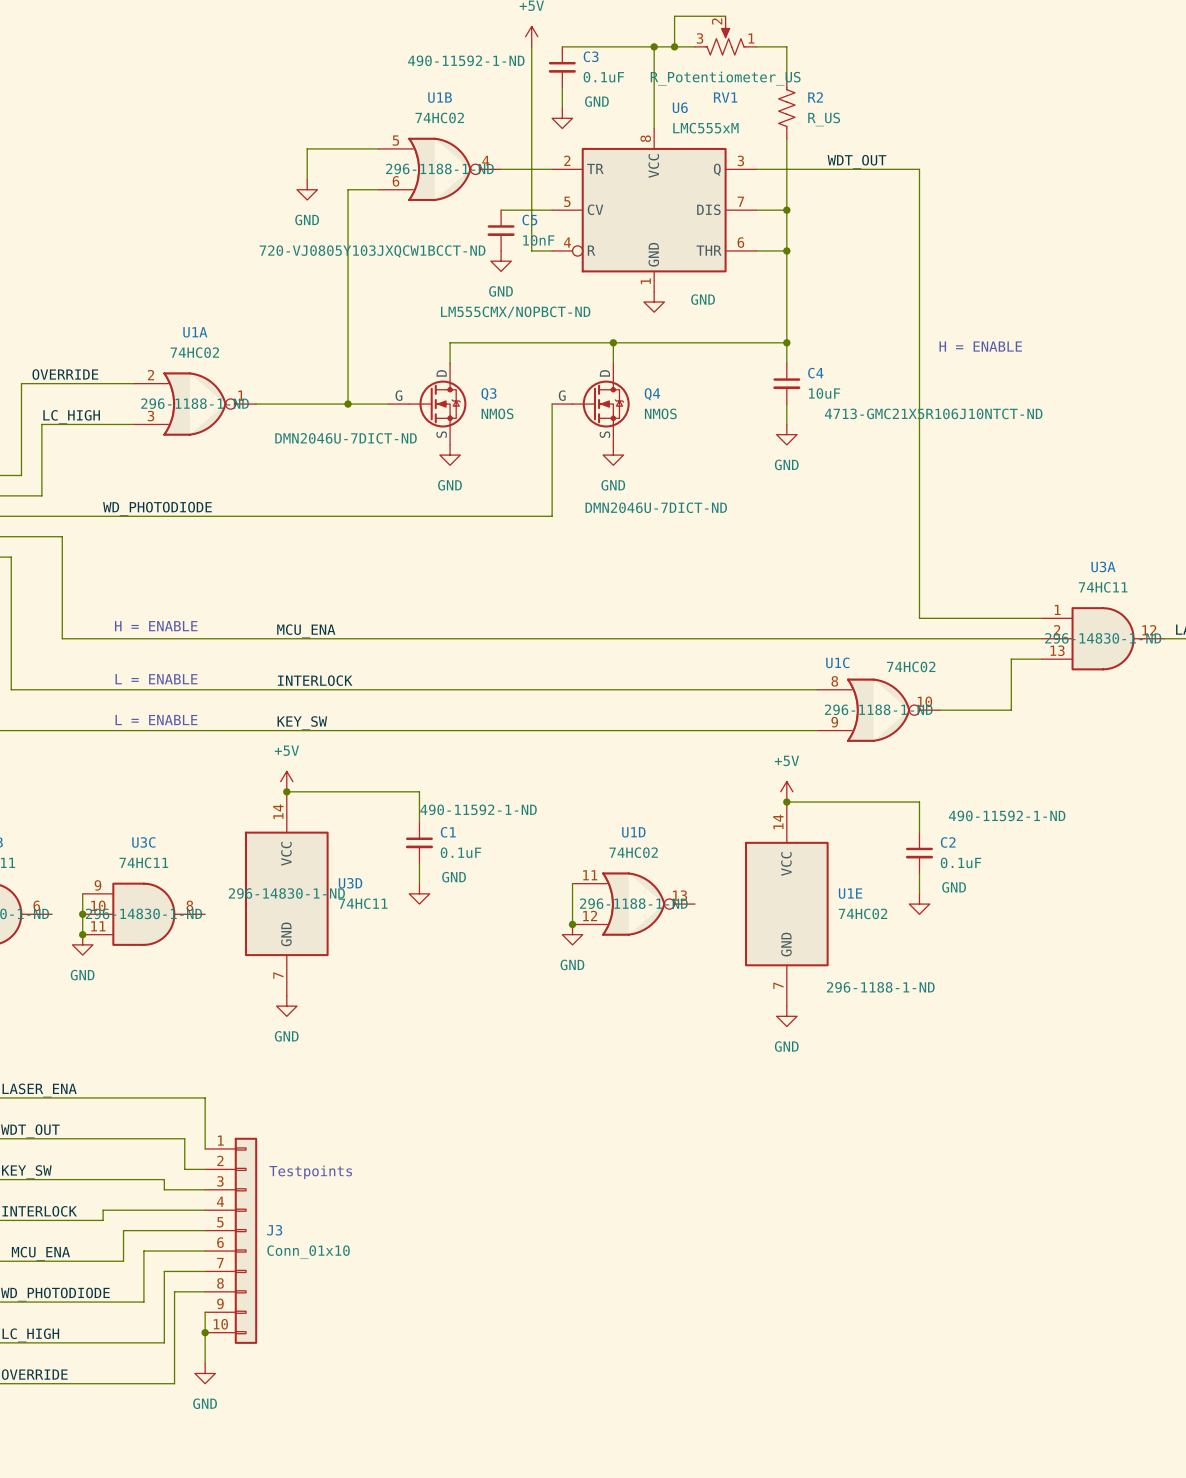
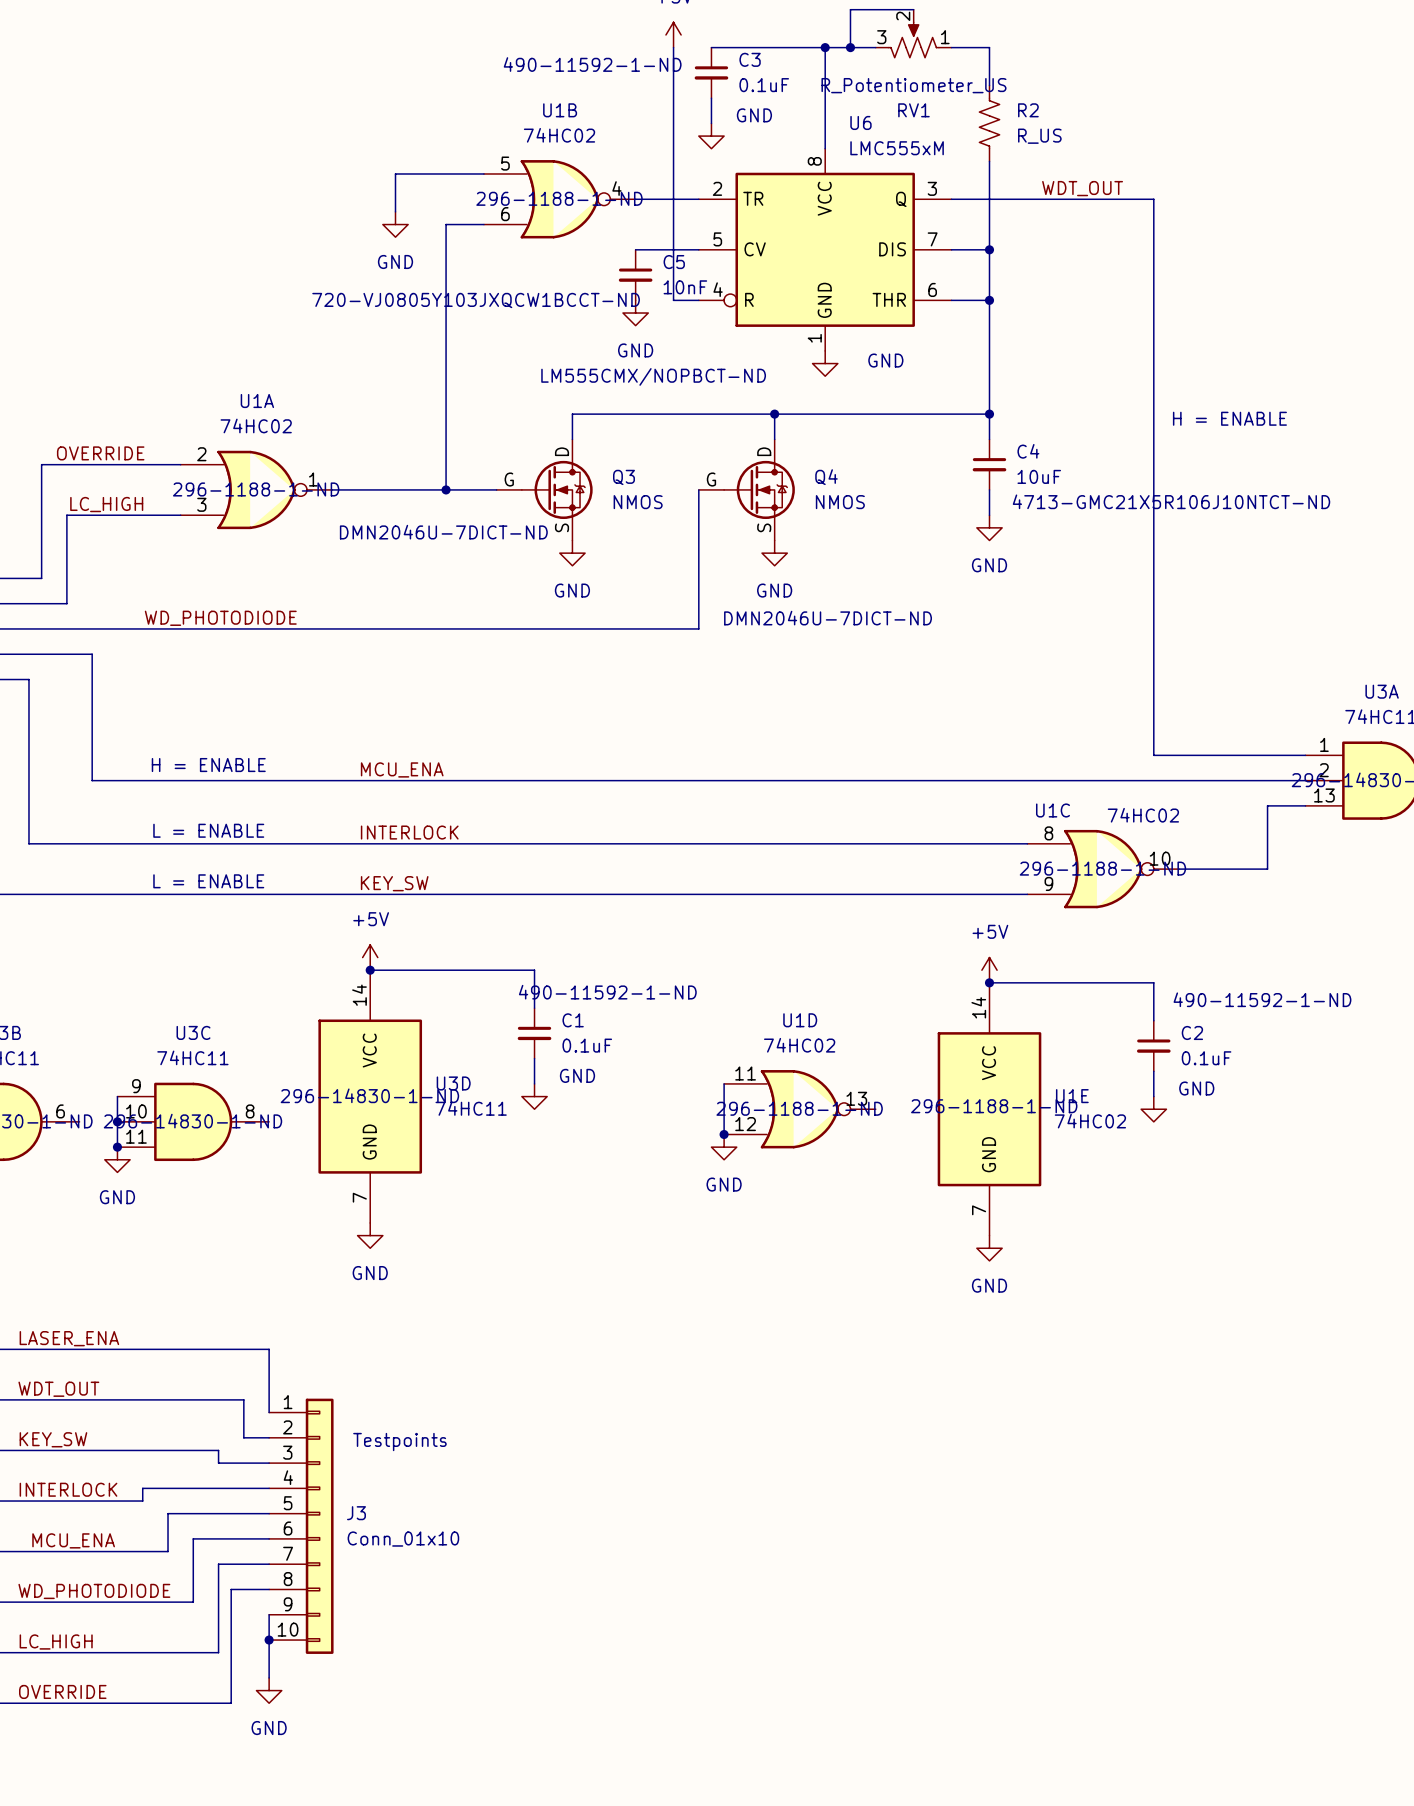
U1E text position: 296-1188-1-ND (880, 987) -> 296-1188-1-ND (994, 1106)

